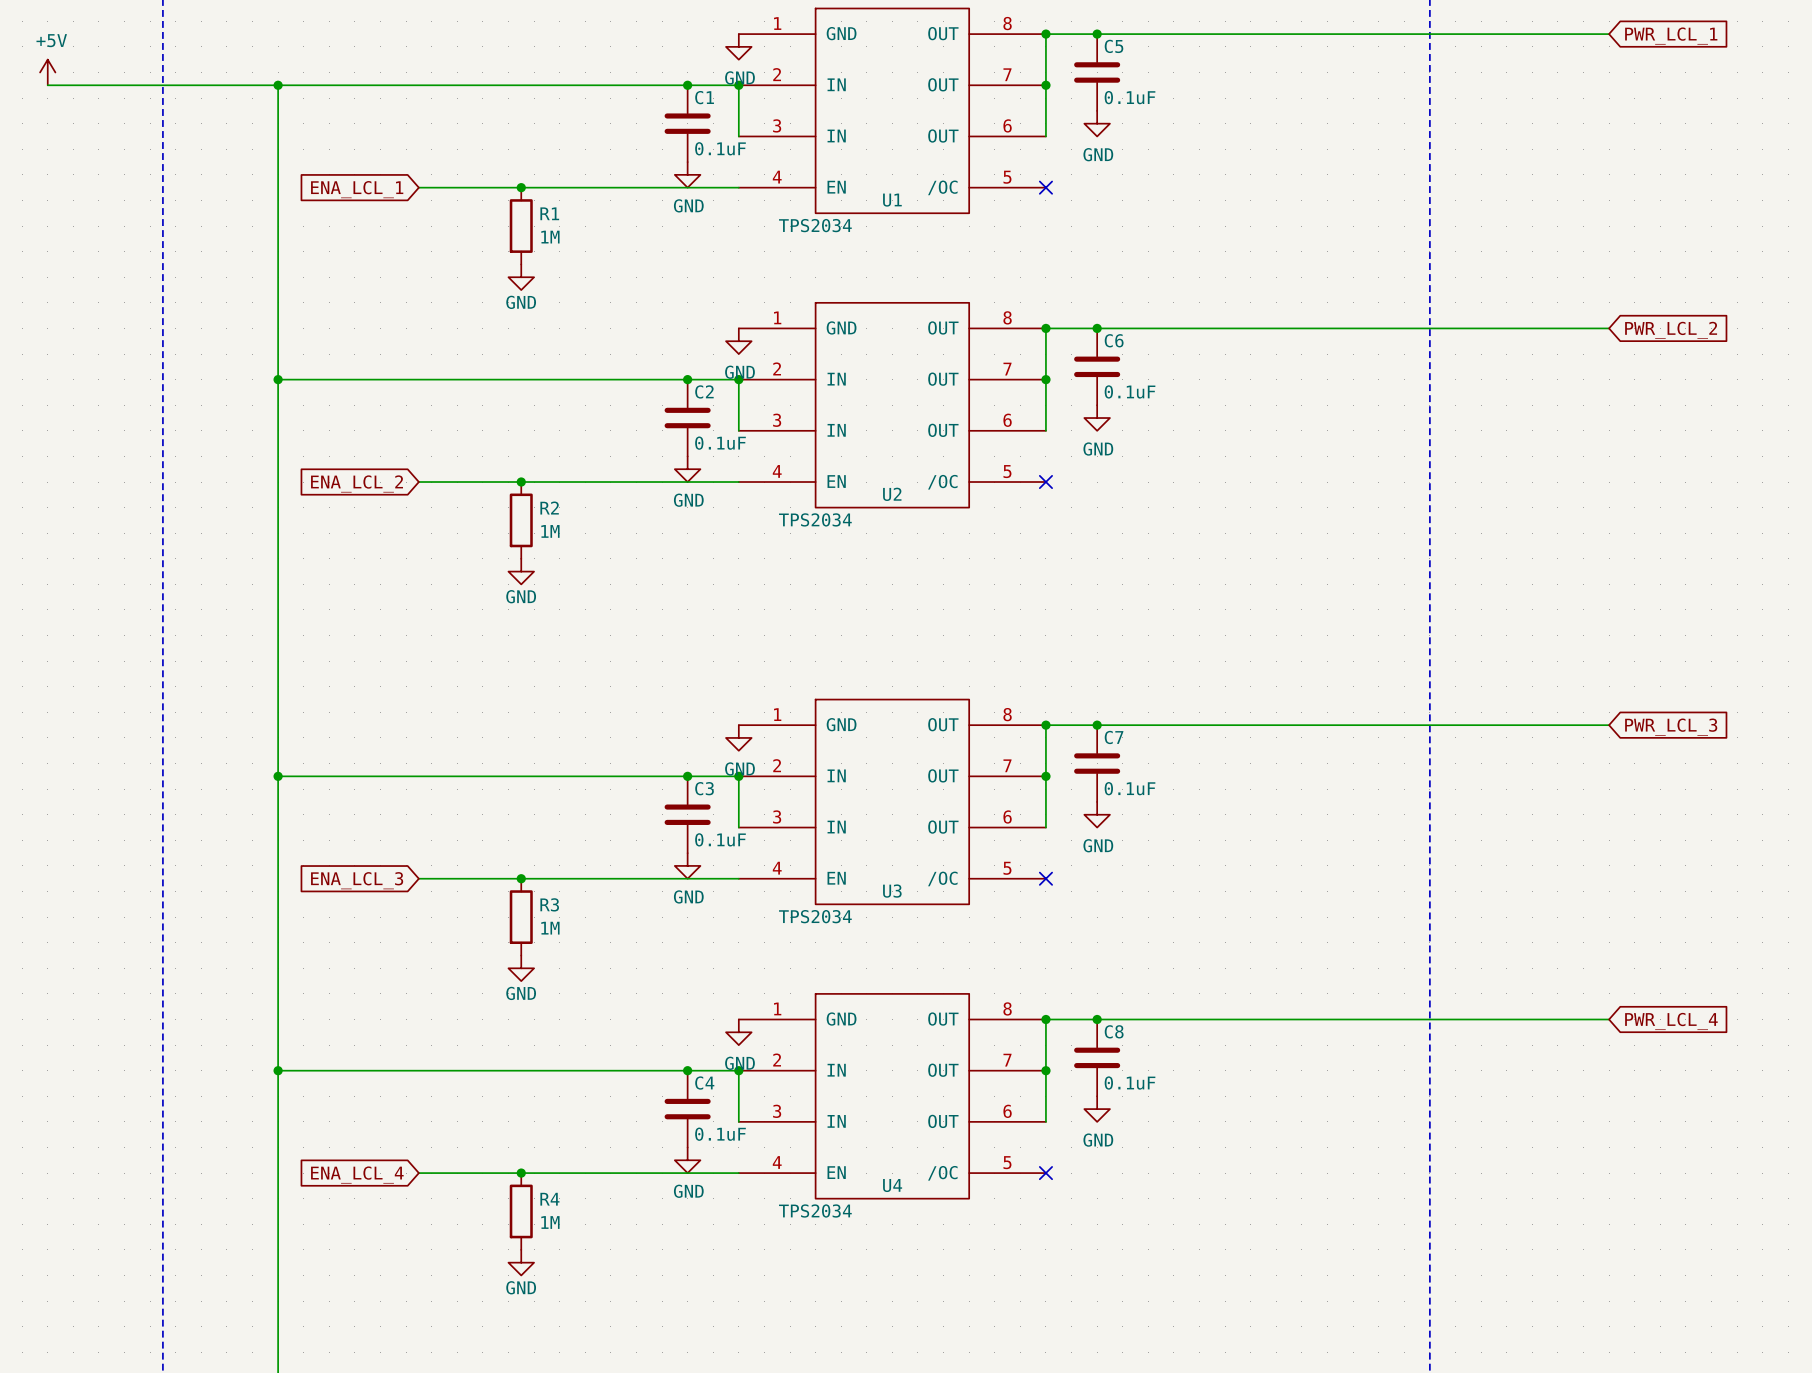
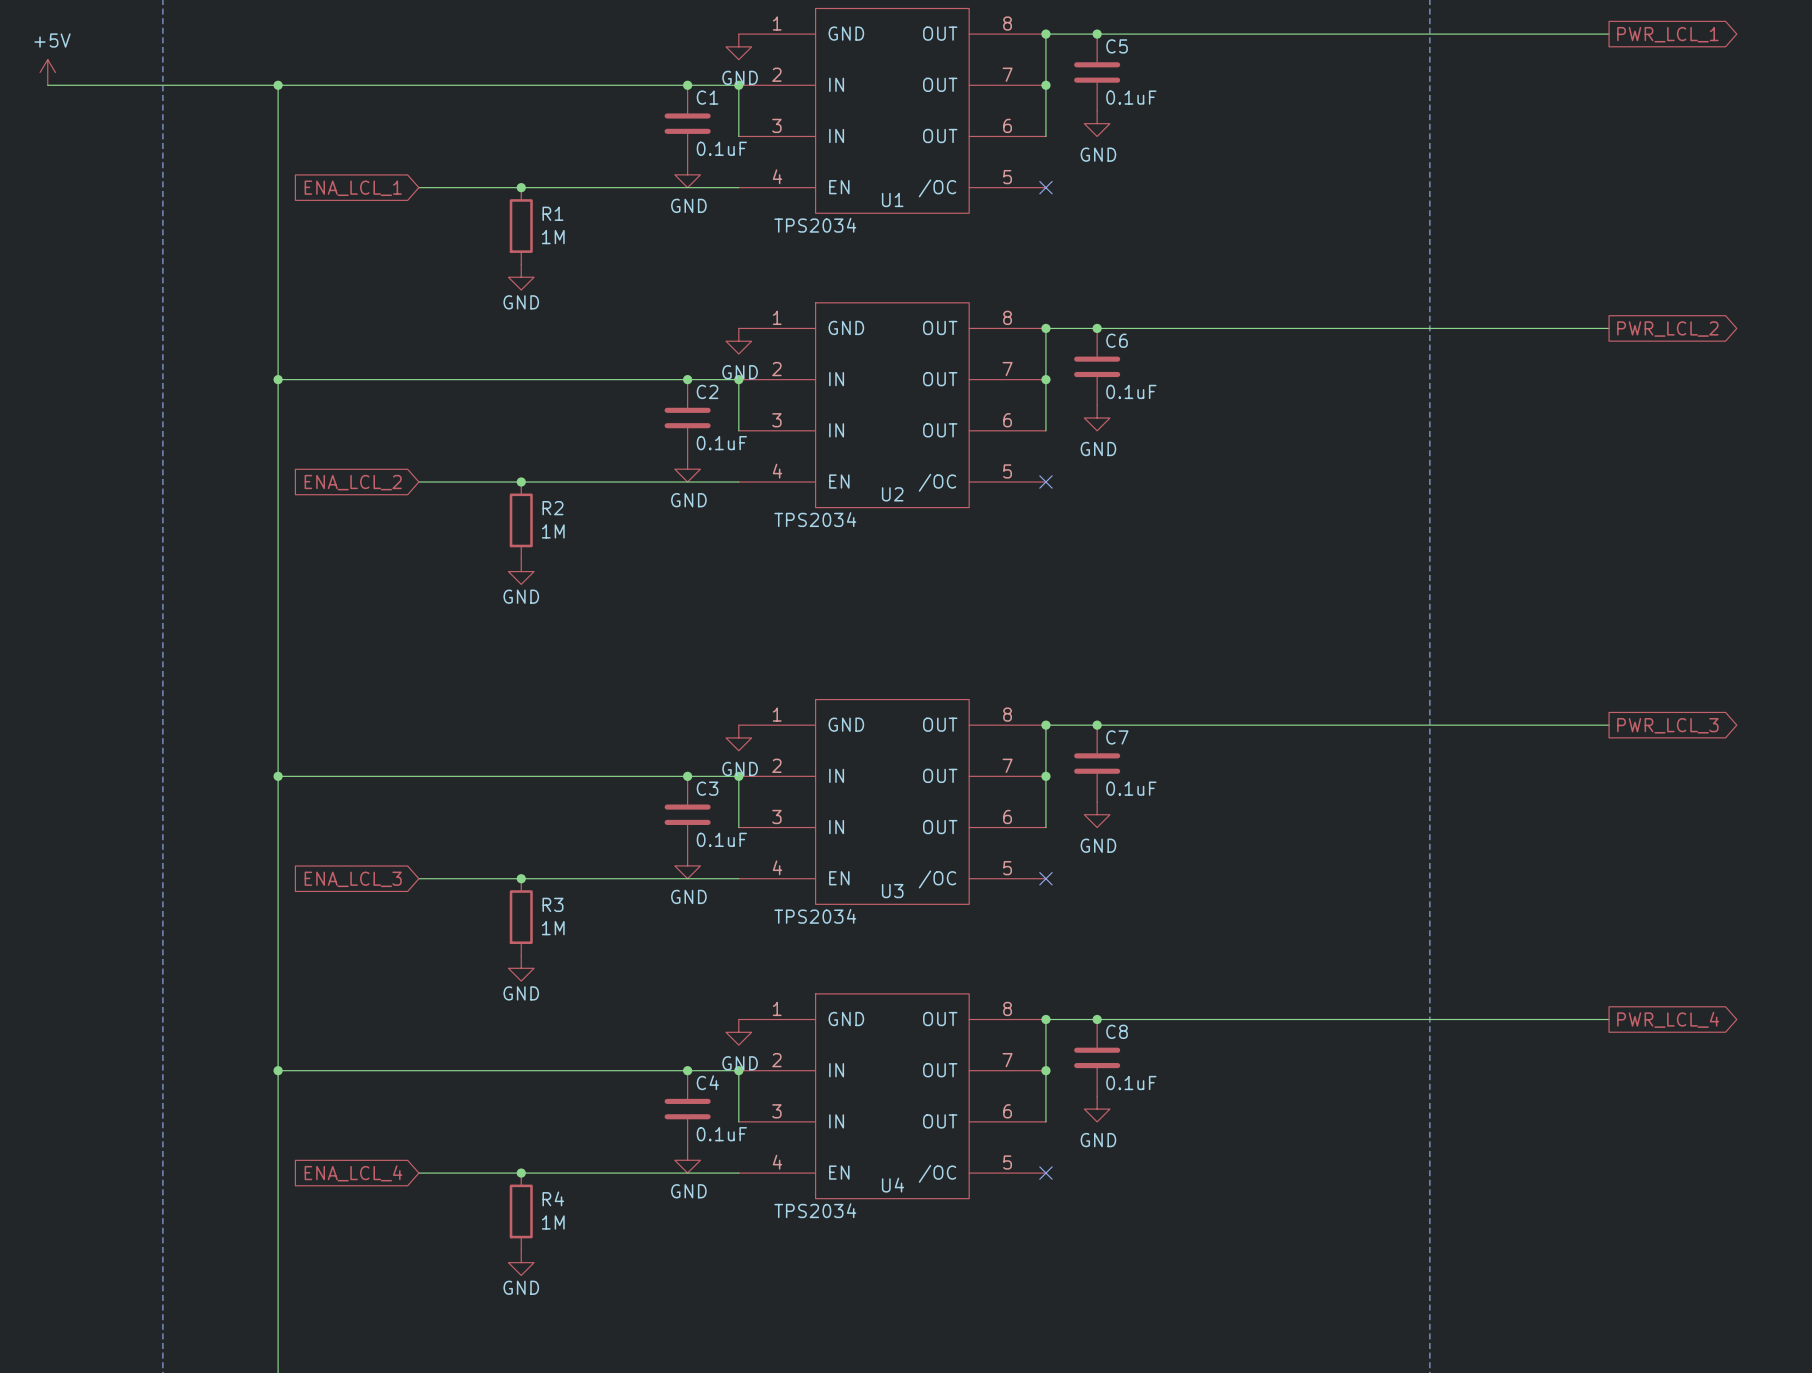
global label shape: input (1671, 36) -> output (1667, 34)
global label shape: input (1671, 330) -> output (1667, 329)
global label shape: input (1671, 727) -> output (1667, 725)
global label shape: input (1671, 1021) -> output (1668, 1019)

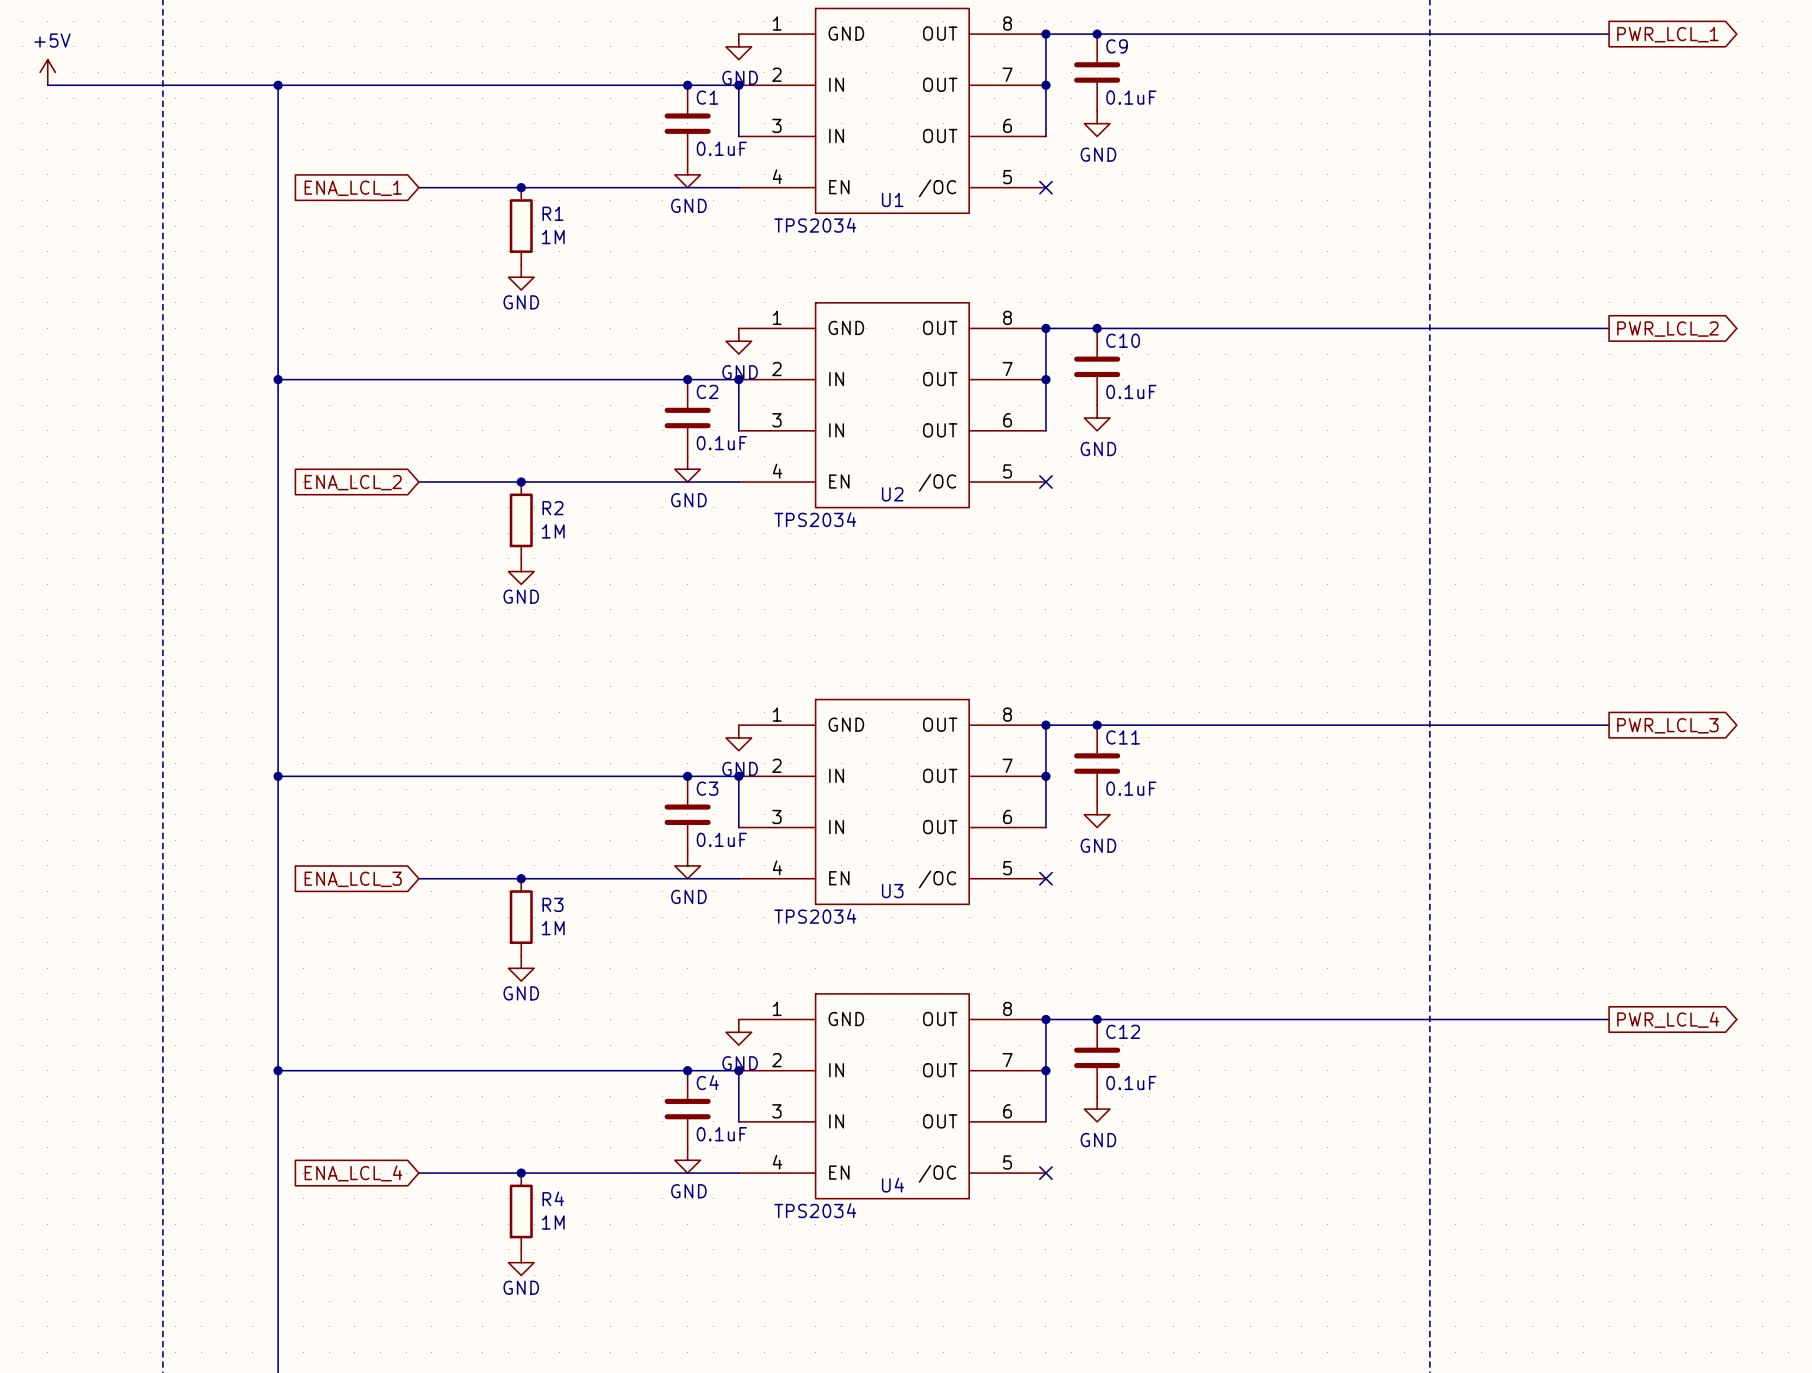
C5 name: C5 (1117, 46) -> C9 (1117, 46)
C6 name: C6 (1117, 340) -> C10 (1123, 340)
C7 name: C7 (1117, 737) -> C11 (1123, 737)
C8 name: C8 (1117, 1031) -> C12 (1123, 1031)

